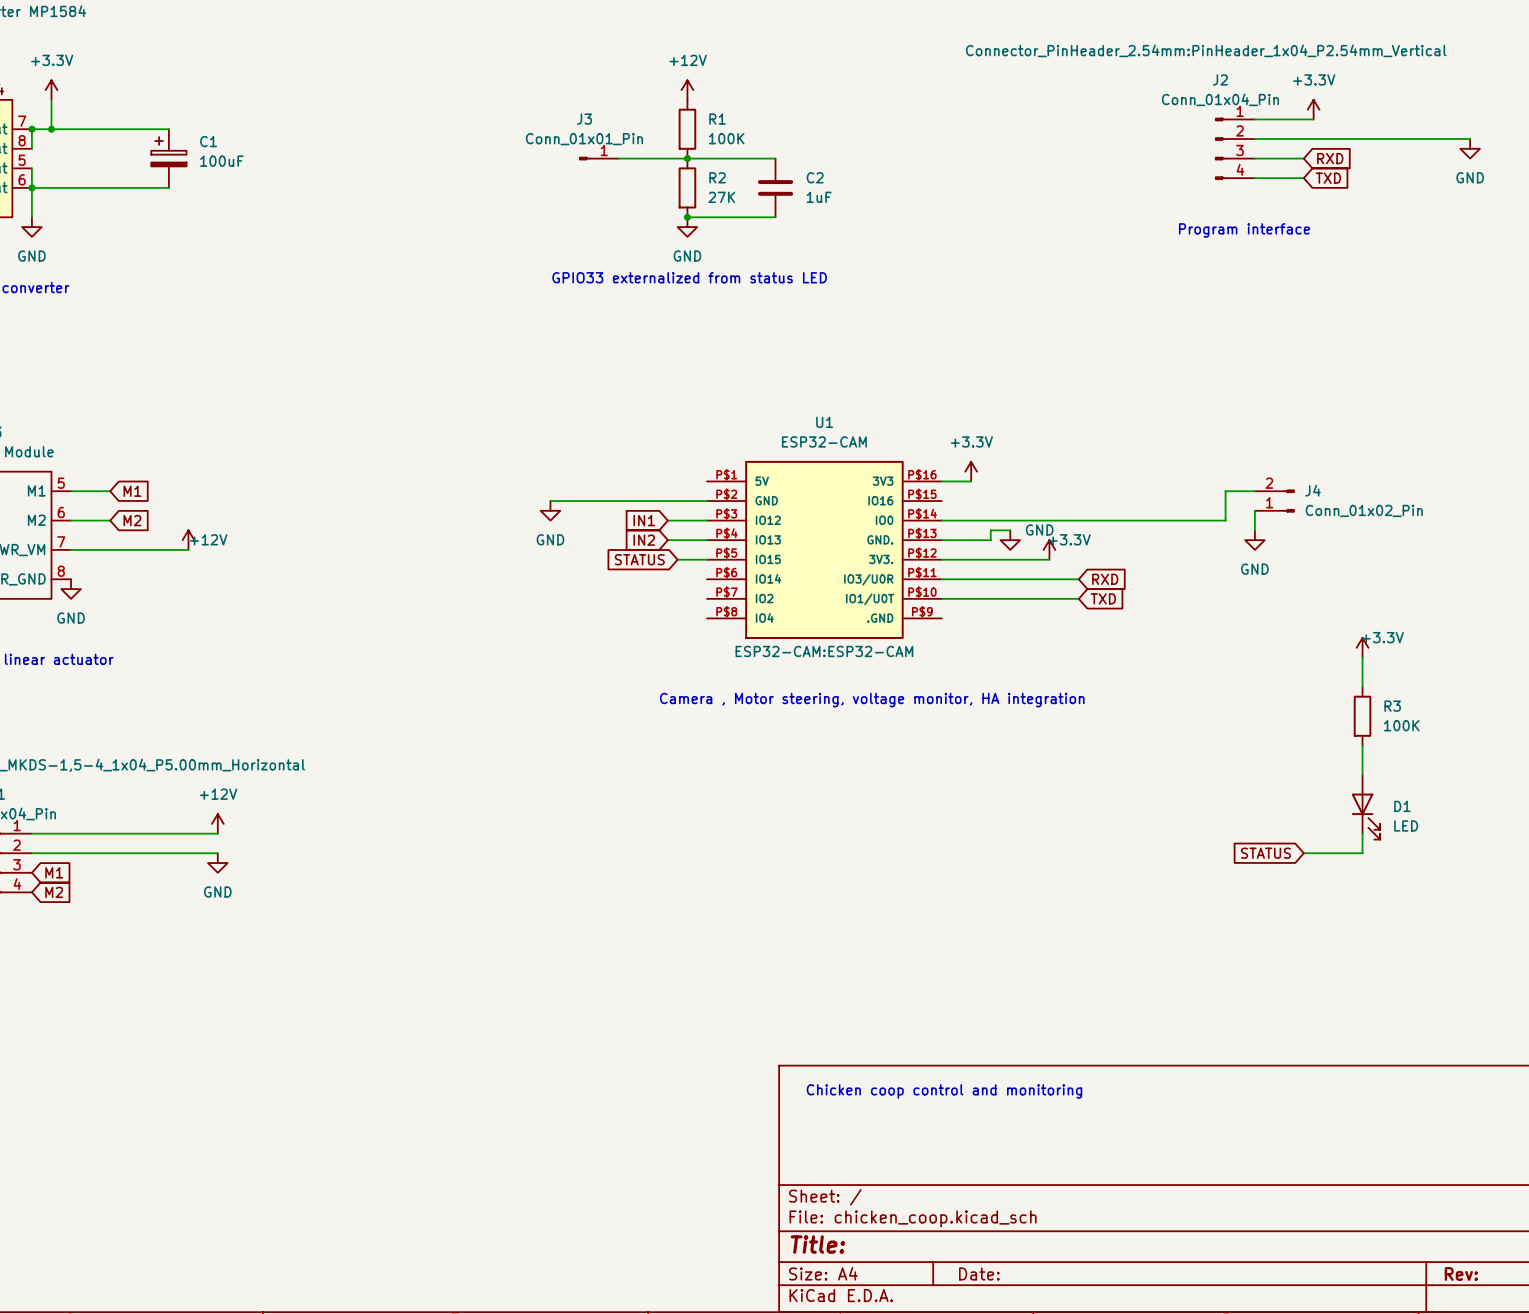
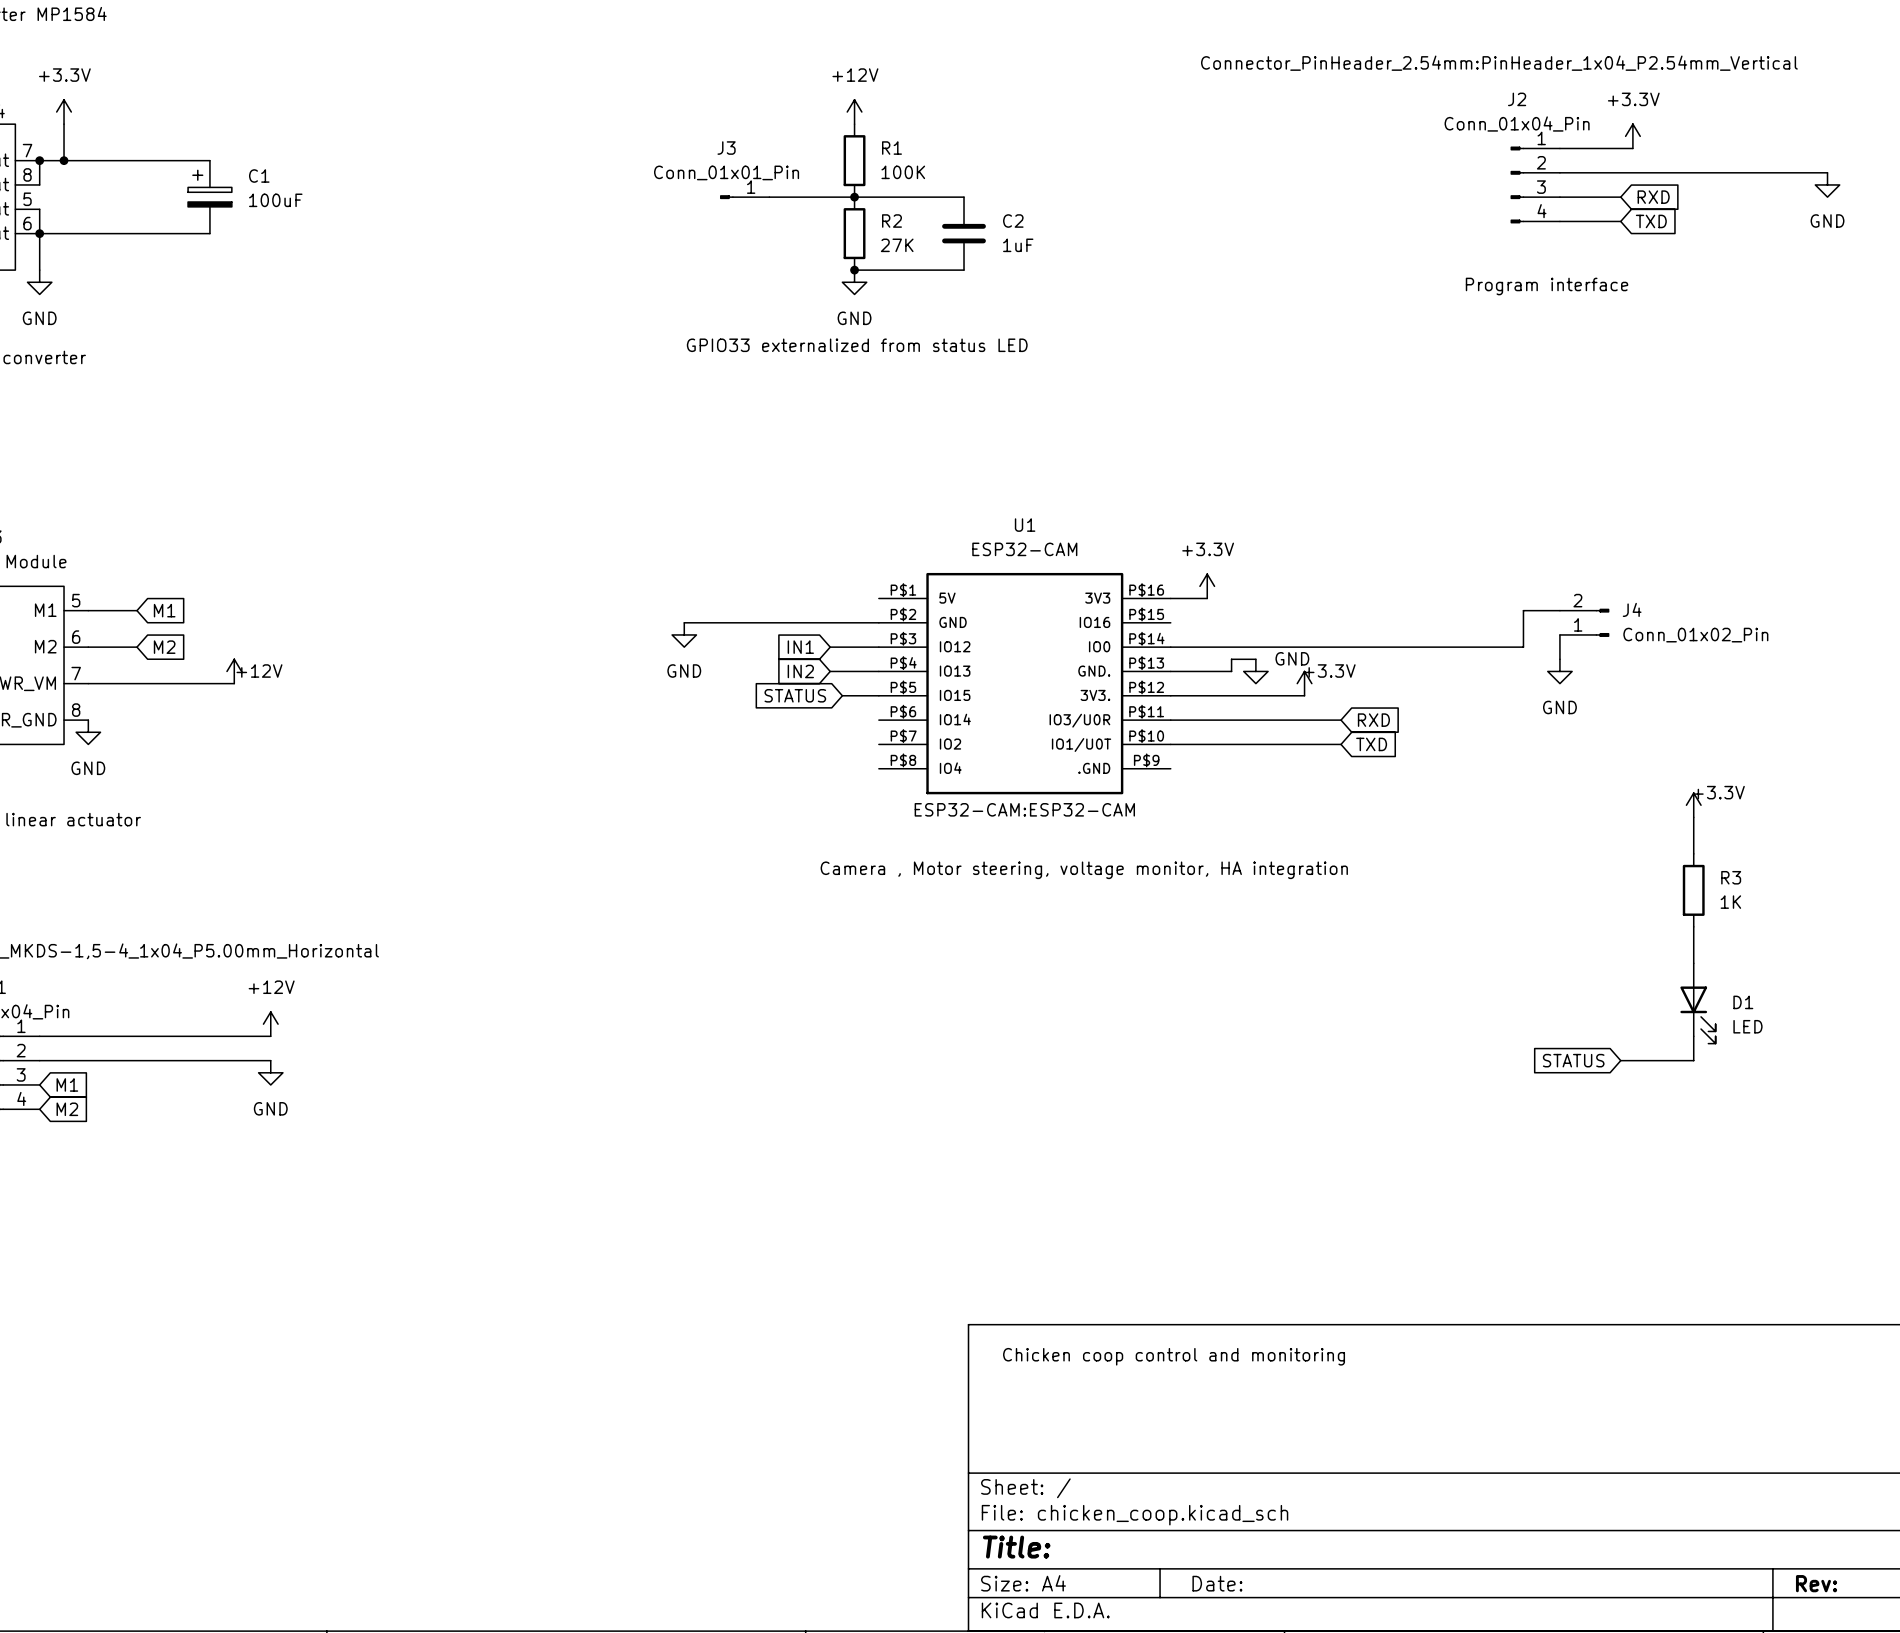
R3 value: 100K (1401, 725) -> 1K (1730, 902)

